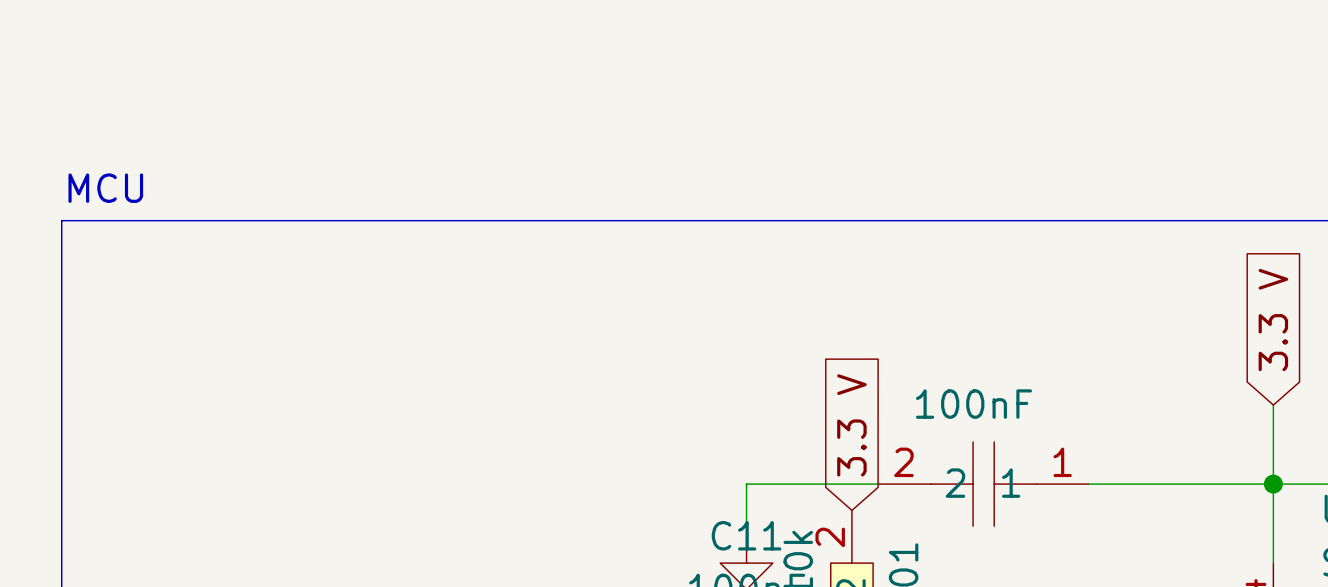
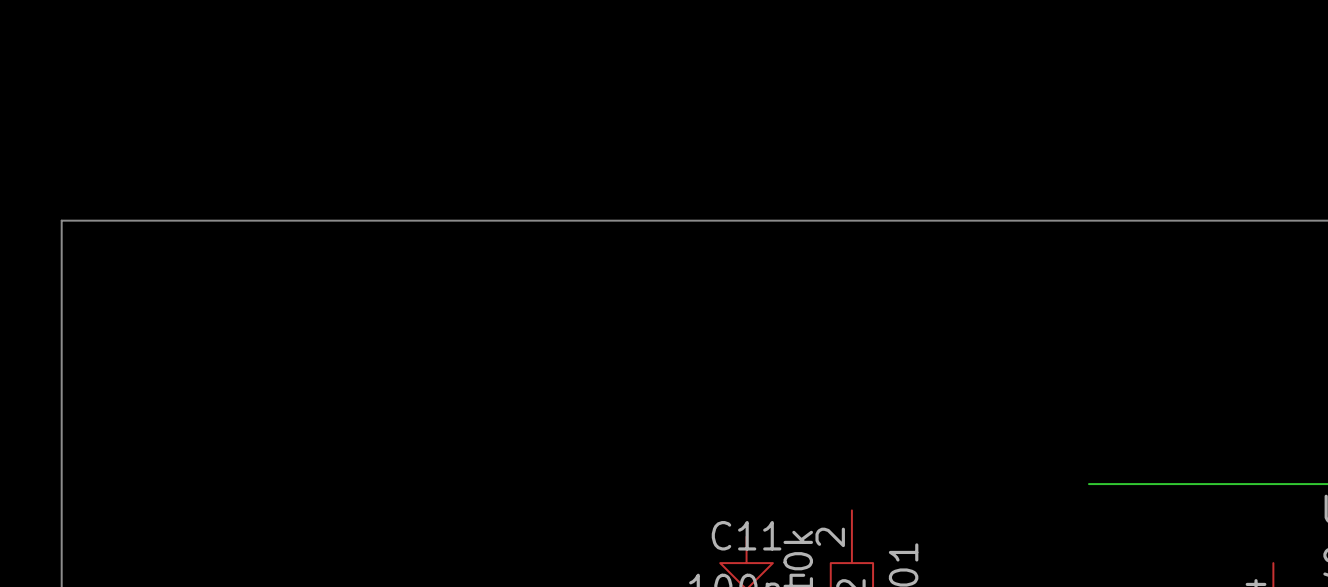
text: MCU (105, 188) -> none
global label: 3.3 V (1273, 320) -> none
wire: (1273, 405) (1273, 563) -> none
global label: 3.3 V (851, 425) -> none
wire: (878, 484) (746, 484) (746, 536) -> none
part: 100nF (983, 484) -> none
junction: (1273, 484) -> none

